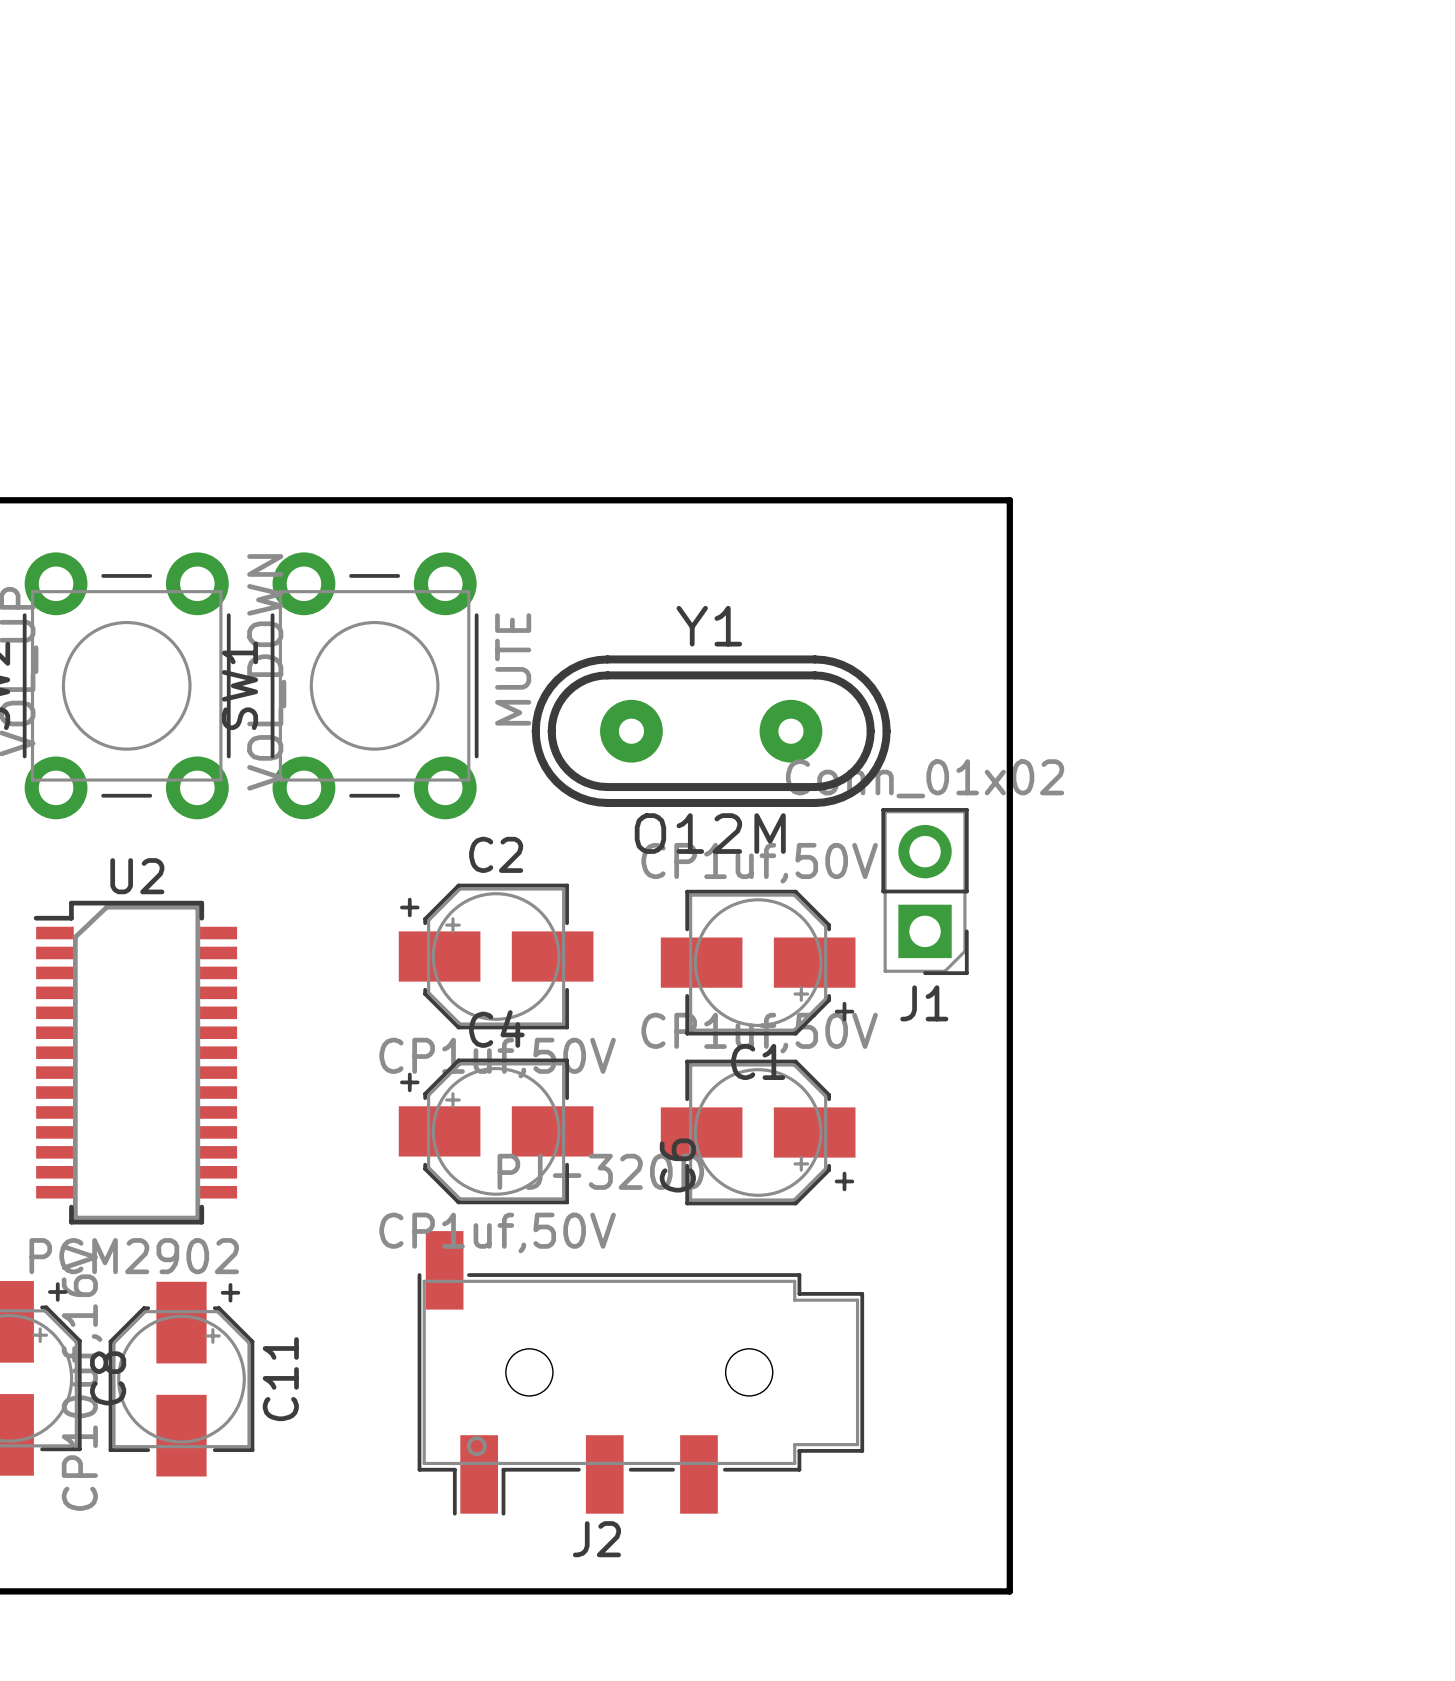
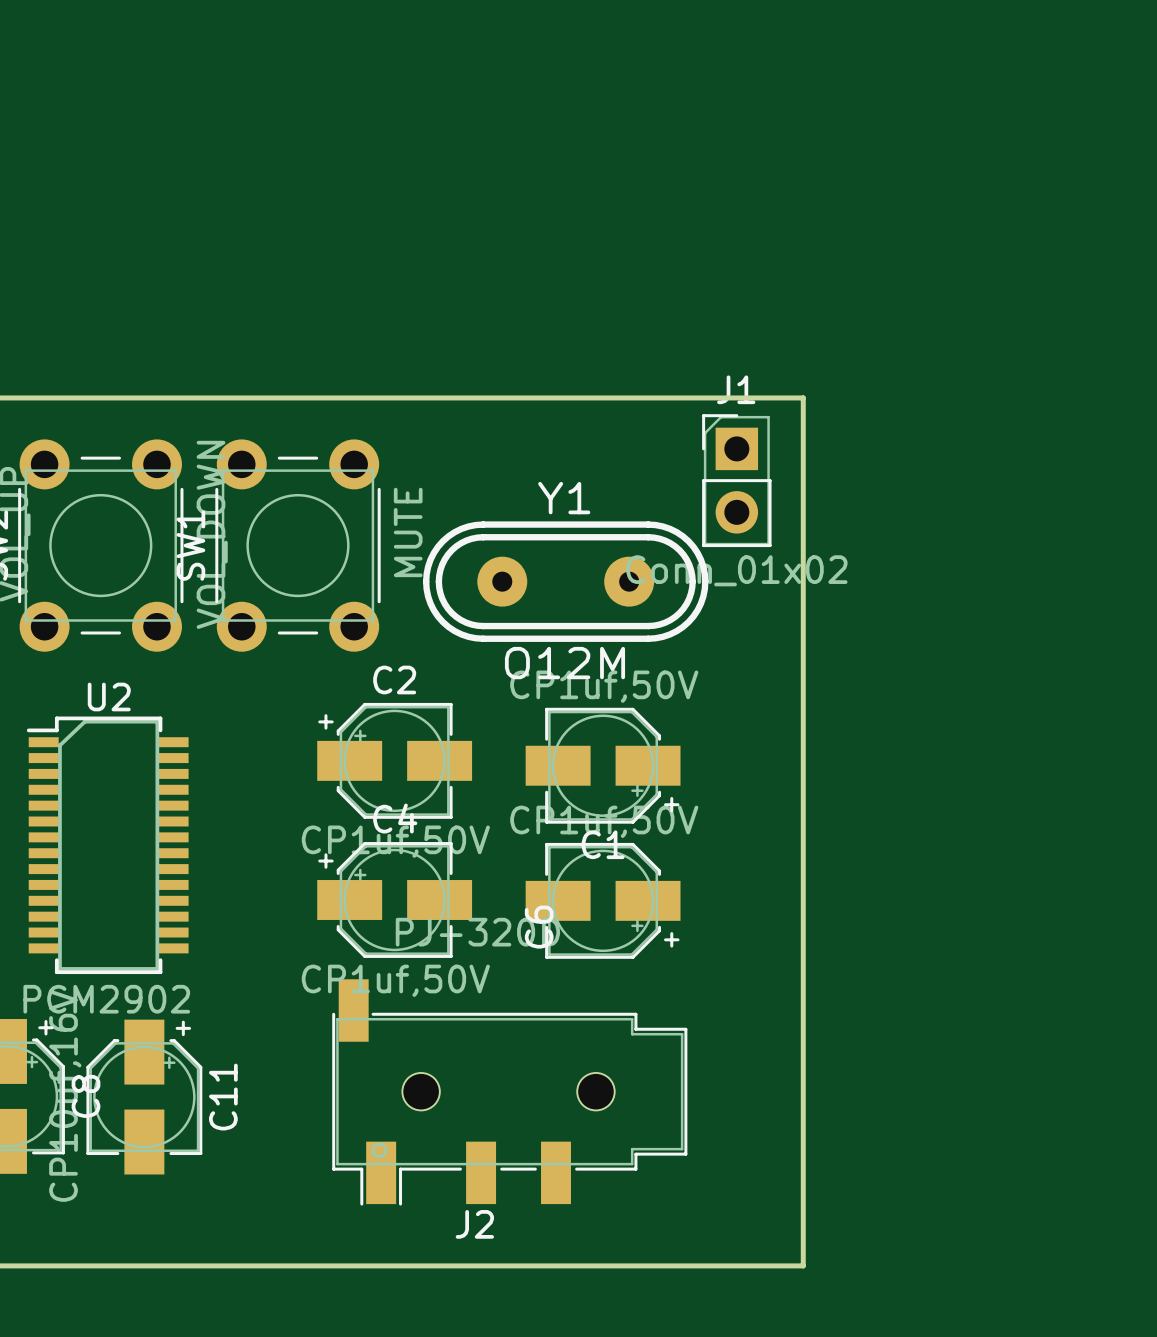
J1 rotation: 0° (925, 891) -> 180° (736, 480)
J1 position: (925, 891) -> (736, 480)

